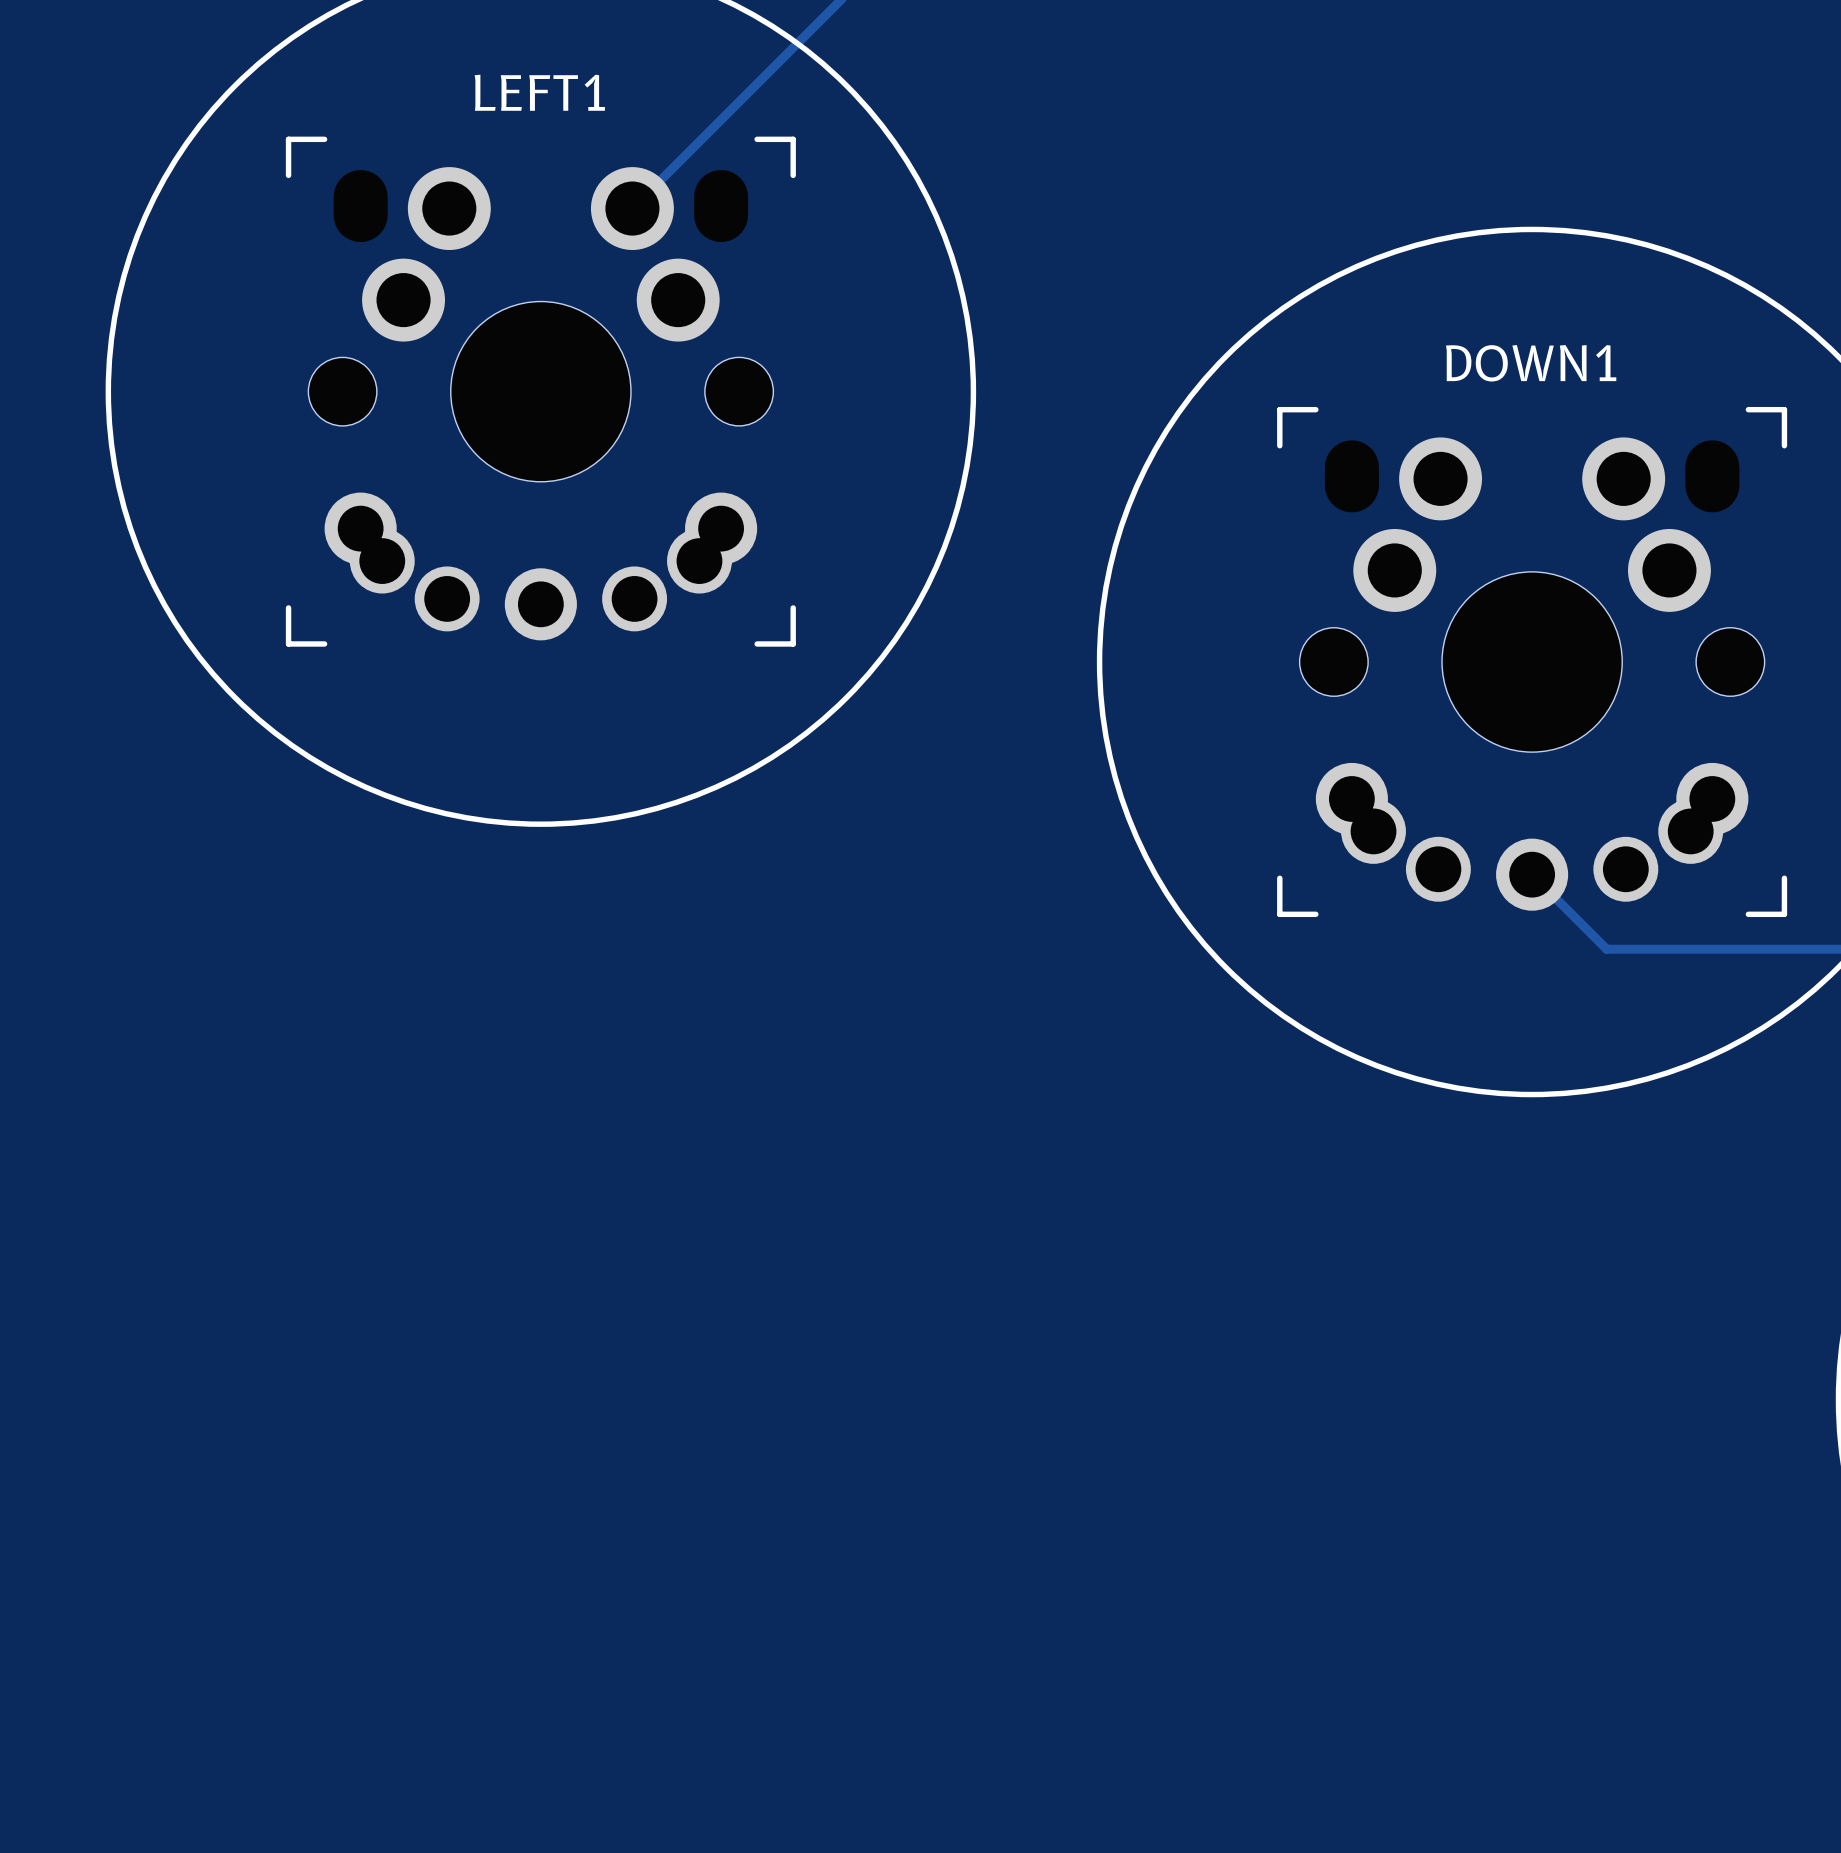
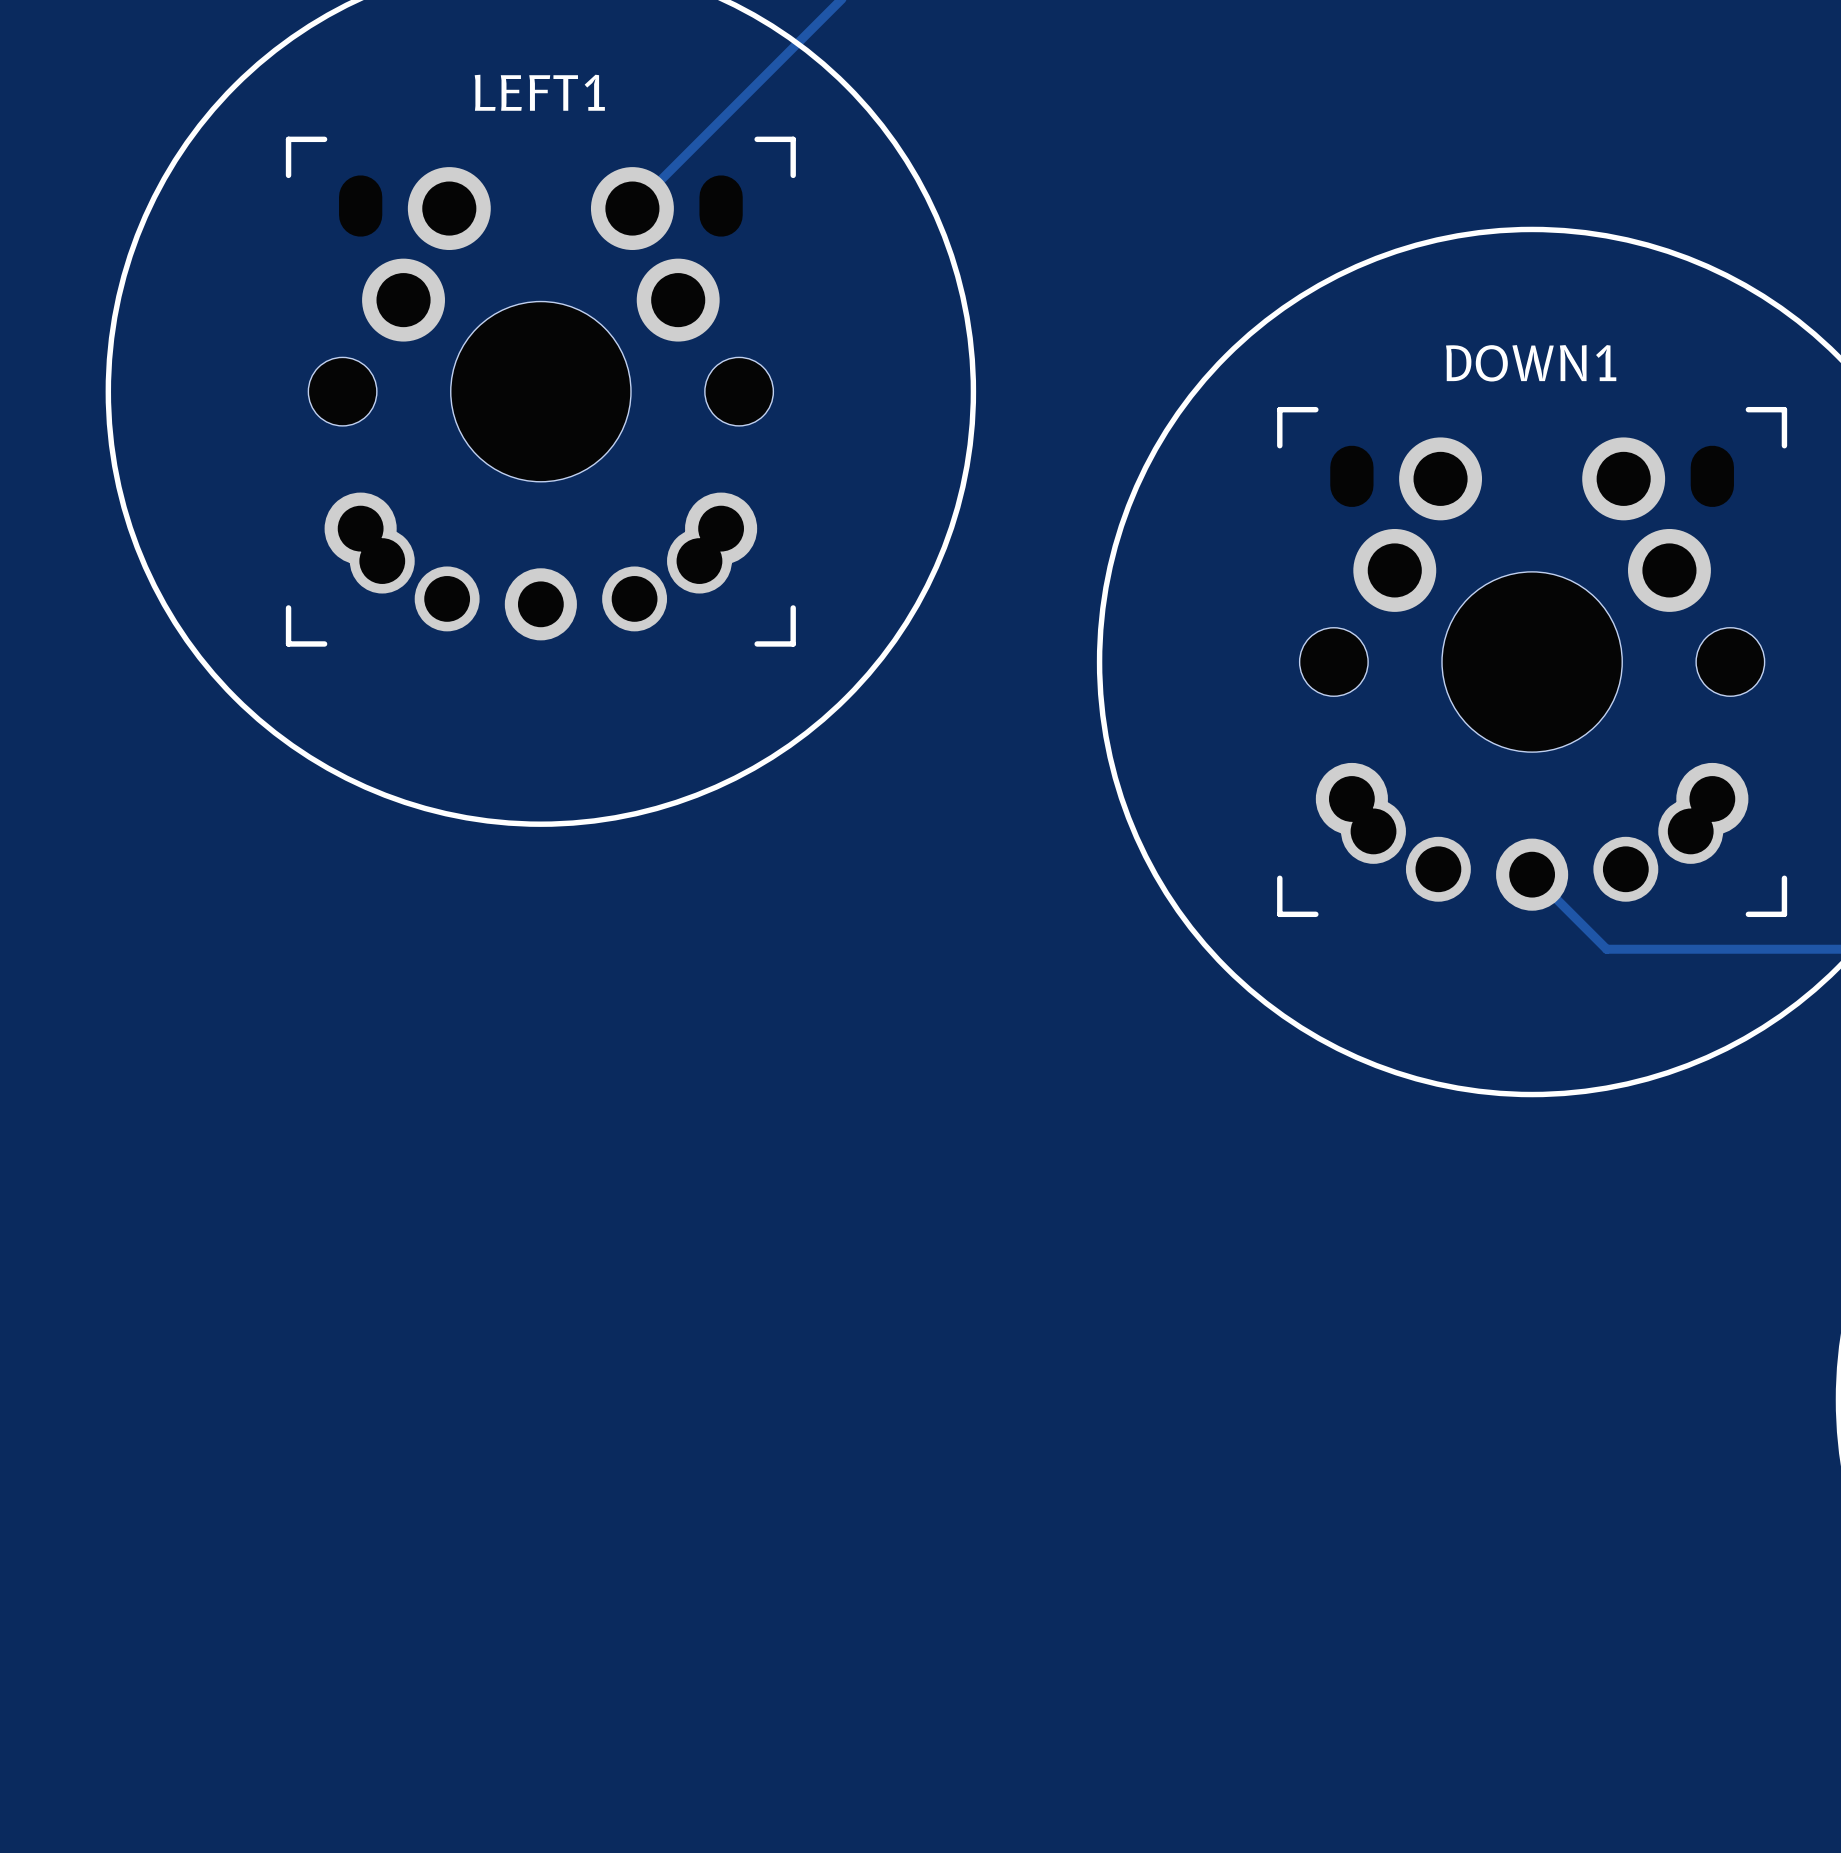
LEFT1 footprint: [285, 136, 796, 647] -> [285, 136, 796, 647]
DOWN1 footprint: [1277, 406, 1788, 918] -> [1277, 406, 1788, 918]

